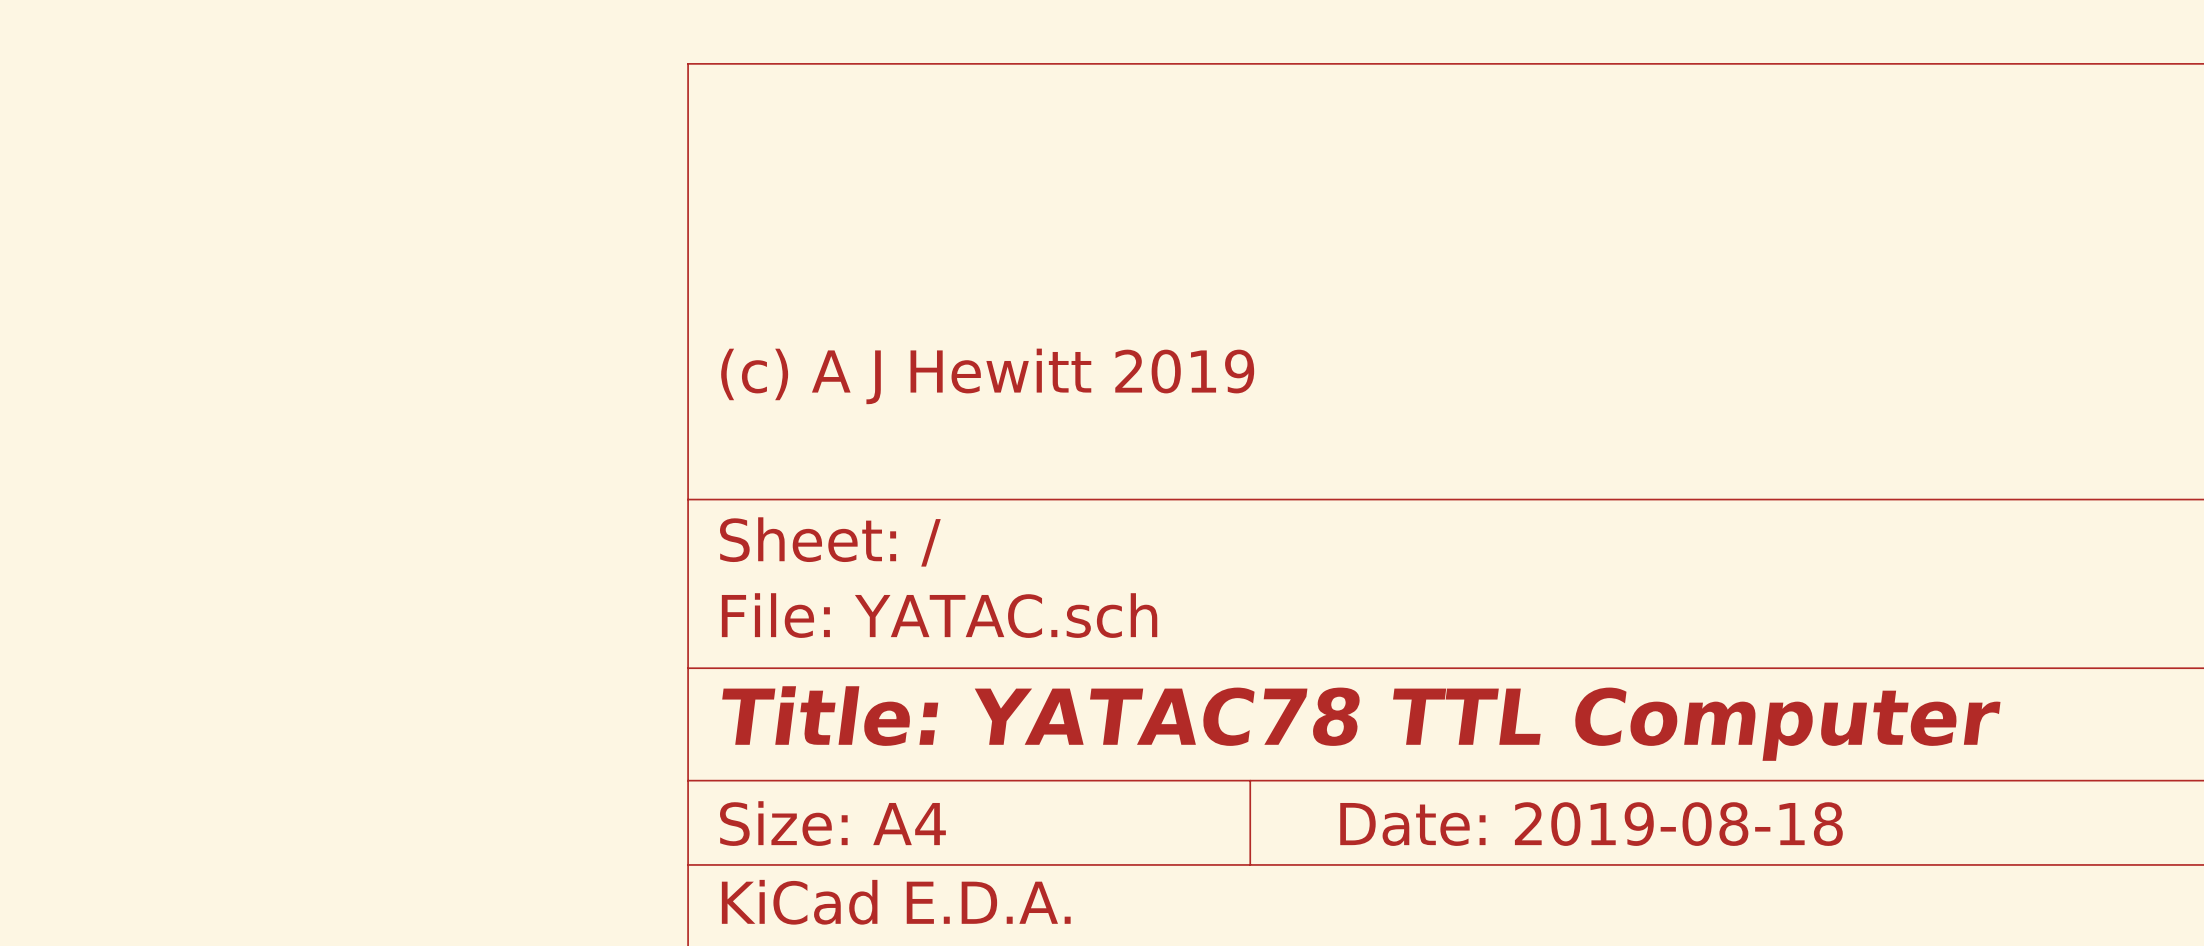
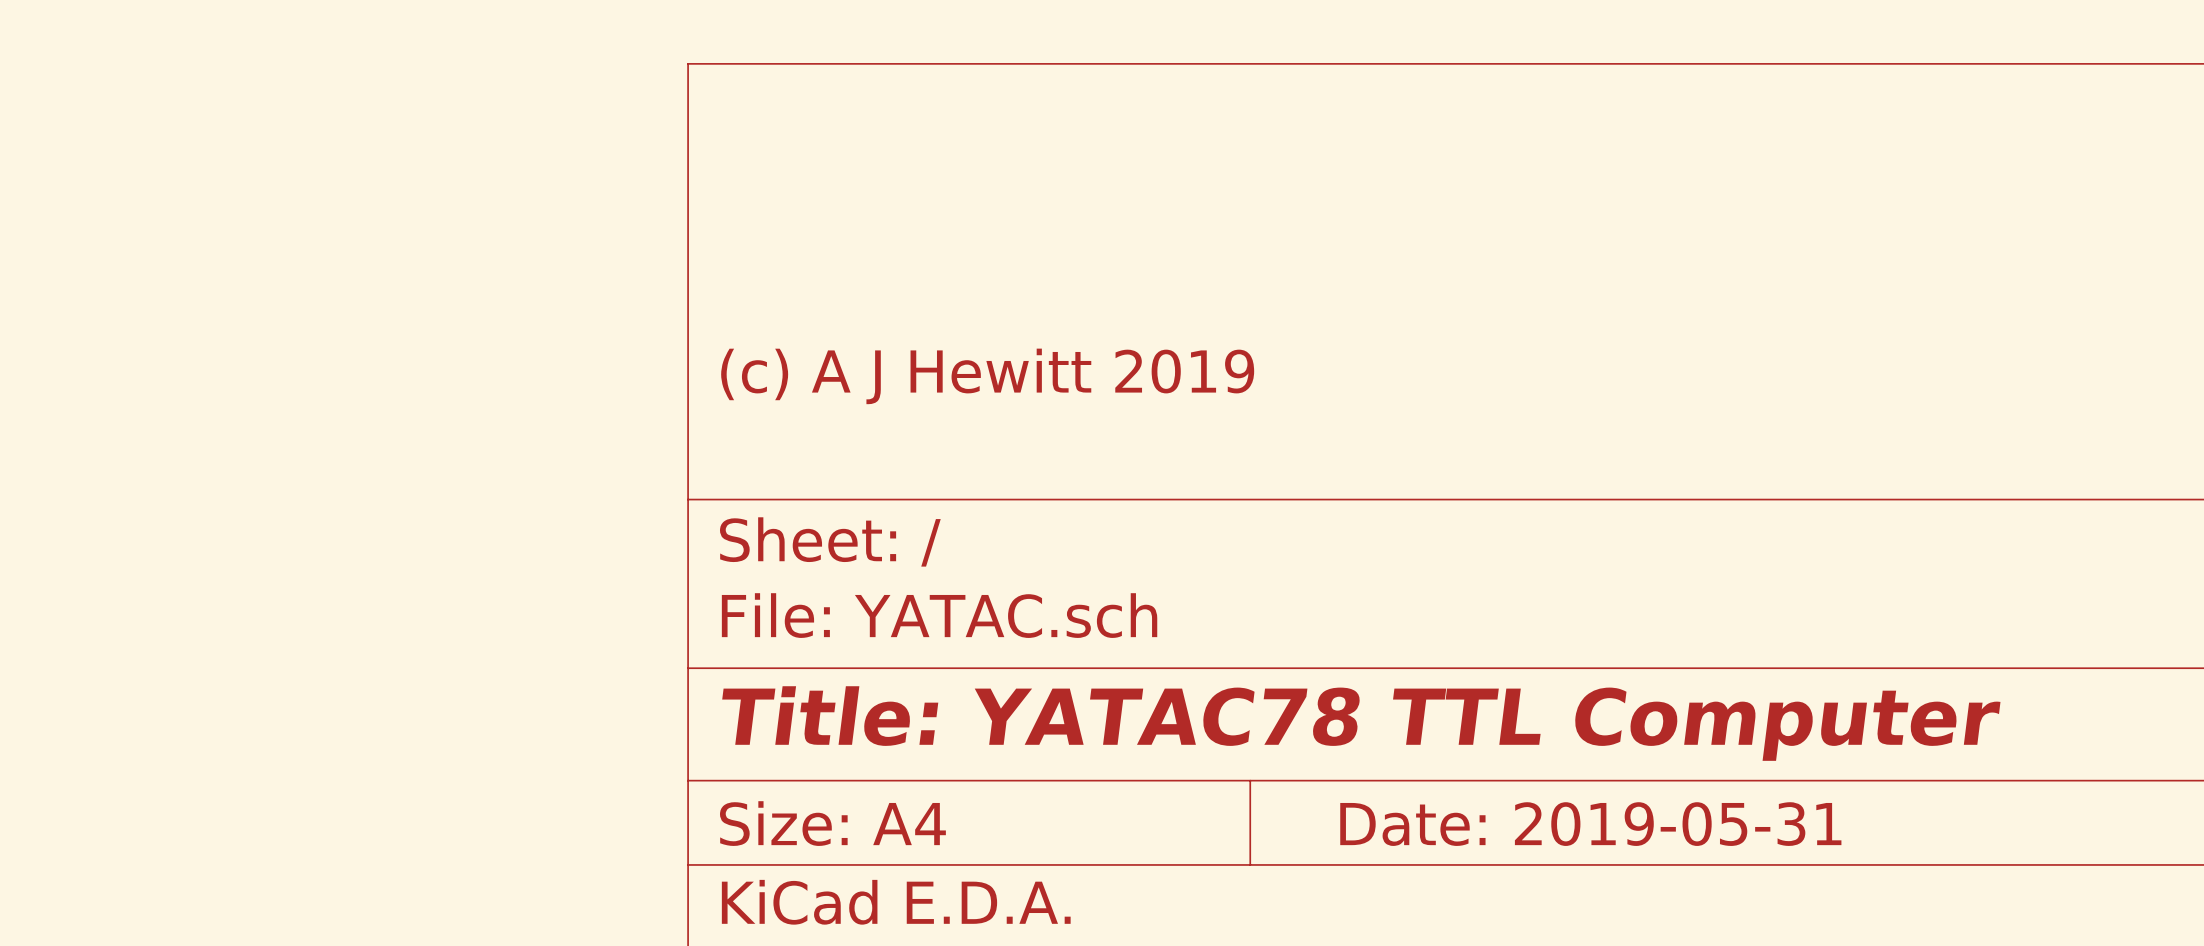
title block: Date: 2019-08-18 (1591, 824) -> Date: 2019-05-31 (1590, 824)

